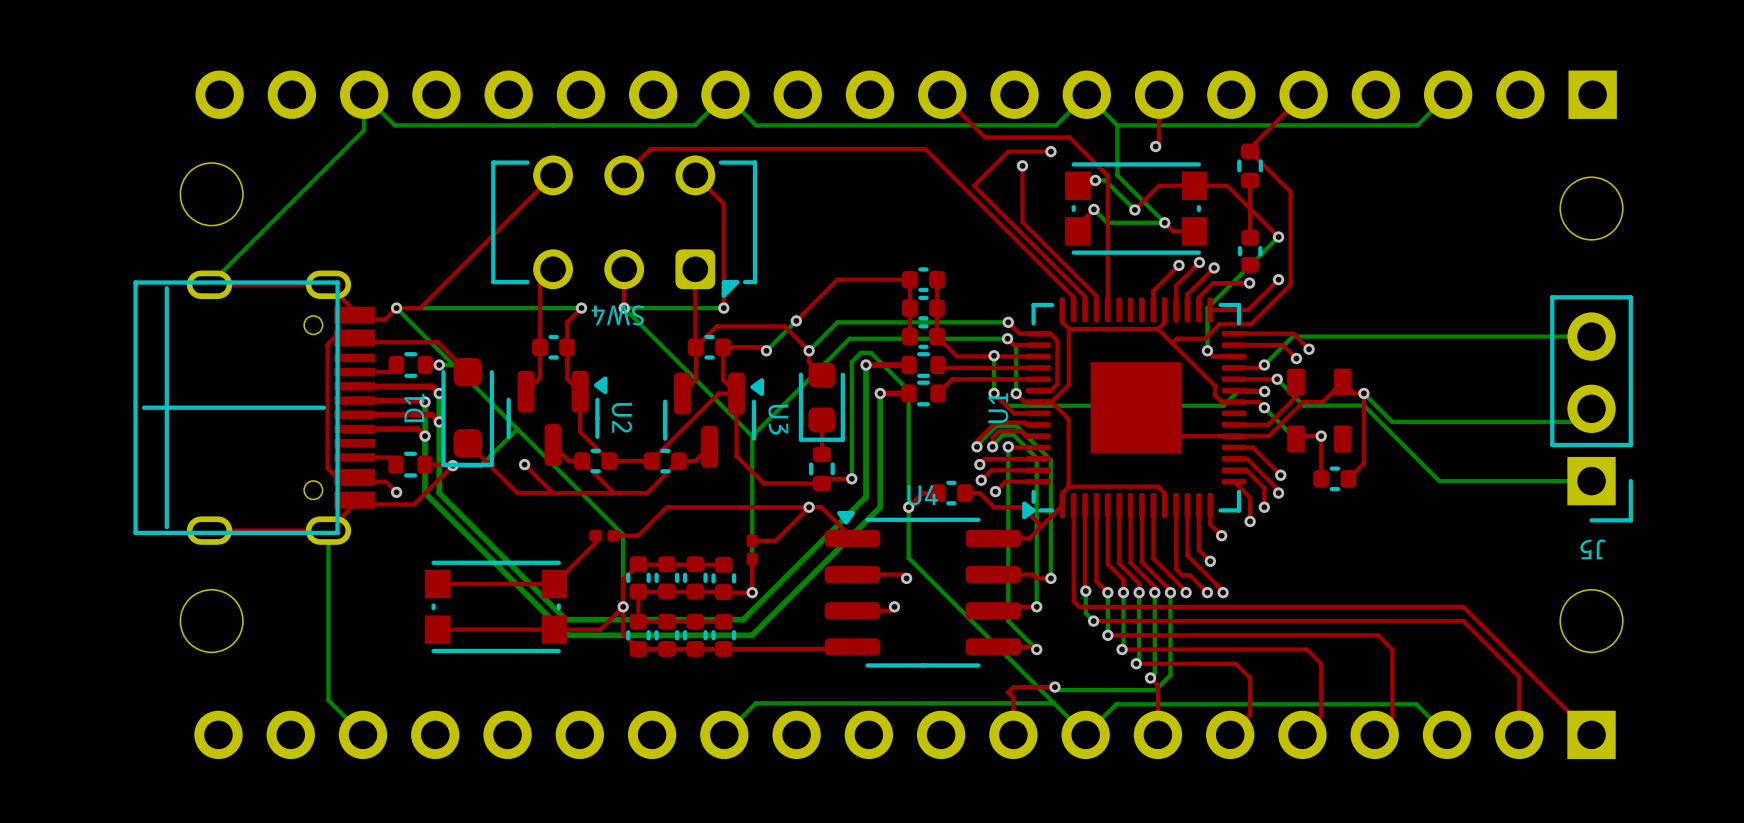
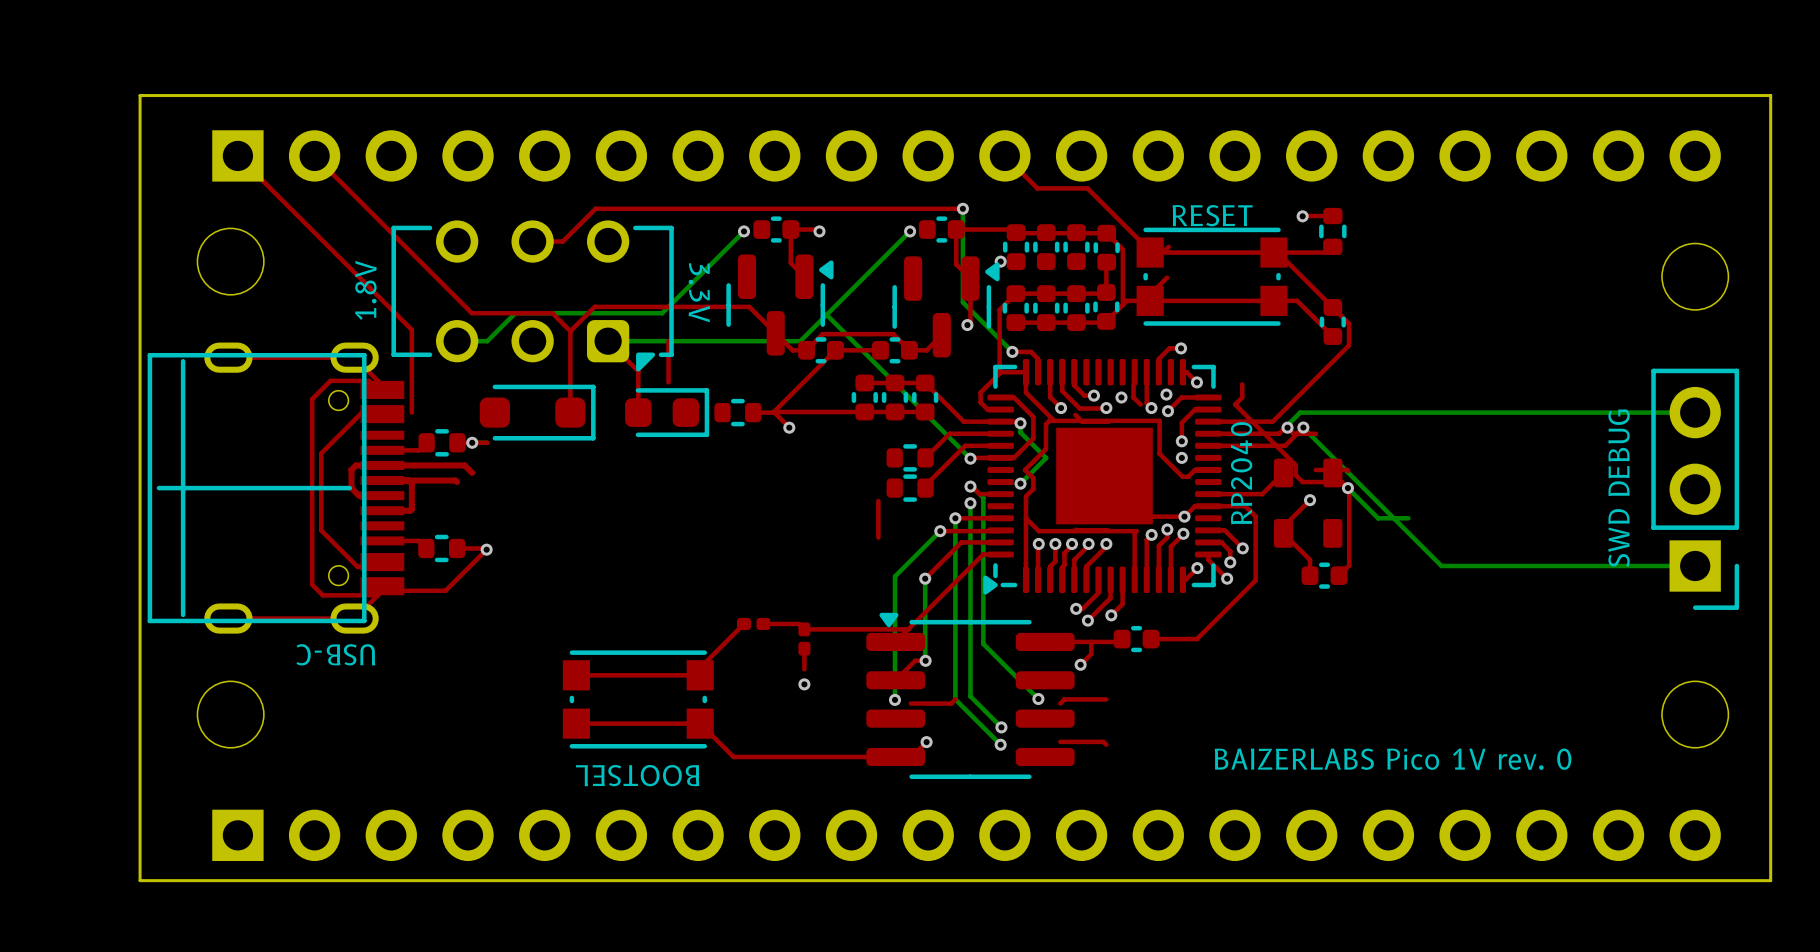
board edge: none -> (140, 95) (1770, 95) (1770, 880) (140, 880) (140, 95)
top track: none -> (237, 155) (411, 329) (411, 412)
top track: none -> (314, 155) (471, 313) (552, 313) (570, 331)
part rotation: 0° (906, 94) -> 180° (966, 155)
top track: none -> (1004, 155) (1037, 188) (1087, 188) (1150, 252)
top track: (942, 94) (984, 137) (1069, 137) (1107, 175) (1107, 309) -> none
top track: (1159, 94) (1159, 143) (1155, 146) -> none
top track: (1303, 94) (1250, 148) (1250, 151) (1290, 191) (1290, 284) (1251, 324) (1219, 324) (1205, 338) (1176, 338) (1172, 343) -> none
bottom track: (1448, 94) (1417, 125) (1117, 125) -> none
bottom track: (1117, 125) (1117, 175) (1164, 222) (1107, 222) (1093, 209) -> none
bottom track: (1117, 125) (1086, 94) (1056, 125) (756, 125) (725, 94) (694, 125) (394, 125) (364, 94) (364, 130) (209, 284) -> none
top track: none -> (962, 208) (595, 208) (562, 241) (532, 241)
bottom track: none -> (962, 208) (962, 302) (1012, 351)
via: none -> (962, 208)
via: (1155, 146) -> none
top track: (1050, 151) (1008, 151) (974, 185) (1085, 296) (1085, 309) -> none
via: (1050, 151) -> none
text: none -> RESET (1212, 215)
via: none -> (1302, 216)
part: none -> (776, 229)
part: none -> (941, 229)
bottom track: none -> (744, 231) (662, 313) (515, 313) (487, 341) (457, 341)
via: none -> (744, 231)
top track: none -> (819, 231) (817, 229) (790, 229) (790, 263) (804, 276)
via: none -> (819, 231)
bottom track: none -> (910, 231) (800, 341) (608, 341)
via: none -> (910, 231)
top track: (1022, 165) (1022, 222) (1096, 295) (1096, 309) -> none
via: (1022, 165) -> none
top track: none -> (1016, 232) (1012, 229) (956, 229) (956, 264) (970, 278) (970, 322) (967, 325)
top track: none -> (1019, 233) (1106, 233) (1122, 249) (1122, 304)
top track: (553, 175) (420, 308) (396, 308) (385, 319) (354, 319) -> (377, 595) (322, 595) (312, 584) (312, 399) (330, 380) (368, 380) (382, 394)
top track: (624, 175) (650, 149) (925, 149) (1073, 297) (1073, 309) -> none
top track: (695, 175) (723, 203) (723, 308) -> none
part: none -> (1016, 247)
part: none -> (1046, 247)
part: none -> (1076, 247)
bottom track: (1095, 180) (1105, 180) (1134, 209) -> none
via: (1095, 180) -> none
top track: (1250, 180) (1250, 237) -> (1332, 246) (1327, 252) (1308, 252)
part: none -> (1106, 247)
top track: (1159, 185) (1134, 209) -> (1236, 252) (1162, 252)
top track: none -> (1277, 252) (1349, 323) (1349, 345) (1272, 421) (1208, 421)
top track: (1227, 185) (1278, 236) -> none
via: none -> (1000, 261)
top track: none -> (1106, 262) (1105, 293) (1015, 293) (999, 309) (1000, 372)
via: (1093, 209) -> none
via: (1134, 209) -> none
text: none -> 1.8V (365, 290)
top track: (1164, 222) (1173, 231) -> (1015, 322) (1105, 322) (1126, 300) (1251, 300)
via: (1164, 222) -> none
text: none -> 3.3V (699, 292)
part: none -> (532, 295)
SW4: (624, 226) -> none
top track: none -> (1273, 300) (1297, 300) (1332, 336)
part: none -> (779, 305)
part: none -> (946, 306)
part: none -> (1106, 306)
bottom track: (1278, 236) (1207, 308) (1207, 350) -> none
via: (1278, 236) -> none
part: none -> (1015, 308)
part: none -> (1046, 308)
part: none -> (1076, 308)
bottom track: none -> (827, 314) (970, 458)
via: none -> (967, 325)
top track: none -> (570, 331) (594, 306) (749, 306) (792, 350) (806, 350) (822, 334) (893, 334) (909, 350) (926, 350) (941, 335)
top track: none -> (570, 331) (570, 412)
top track: (1199, 262) (1176, 285) (1176, 309) -> none
via: (1199, 262) -> none
top track: (1178, 265) (1153, 291) (1153, 309) -> none
via: (1178, 265) -> none
top track: (1214, 267) (1187, 294) (1187, 309) -> none
via: (1214, 267) -> none
top track: (553, 269) (539, 282) (539, 377) (526, 391) -> none
top track: none -> (608, 341) (638, 371) (638, 412)
top track: (695, 269) (695, 350) -> none
top track: none -> (1181, 348) (1169, 348) (1158, 359) (1158, 372)
via: none -> (1181, 348)
part: none -> (821, 350)
top track: none -> (880, 350) (835, 350) (773, 412) (753, 412)
part: none -> (894, 350)
part: (923, 279) -> none
top track: (937, 279) (937, 336) (957, 356) (1038, 356) -> none
top track: none -> (1012, 351) (1030, 351) (1038, 359) (1038, 372)
via: none -> (1012, 351)
top track: (1278, 279) (1248, 309) (1210, 309) -> none
via: (1278, 279) -> none
top track: (1249, 283) (1213, 283) (1198, 297) (1198, 309) -> none
via: (1249, 283) -> none
top track: none -> (1000, 372) (1025, 372) (1025, 392) (1054, 420)
top track: none -> (1000, 372) (980, 392) (980, 402) (987, 409) (1000, 409)
top track: none -> (1050, 372) (1050, 397) (1061, 408)
top track: none -> (1062, 372) (1062, 390) (1079, 408) (1106, 408)
top track: none -> (1074, 372) (1074, 385) (1084, 395) (1093, 395)
top track: none -> (1146, 372) (1146, 403) (1151, 408)
top track: none -> (1182, 372) (1186, 372) (1196, 382)
via: (396, 308) -> none
top track: (581, 308) (567, 322) (567, 378) (580, 391) (580, 431) (609, 461) (651, 461) (718, 393) (736, 393) -> none
bottom track: (581, 308) (396, 308) (623, 534) (623, 606) -> none
via: (581, 308) -> none
via: (624, 308) -> none
bottom track: (723, 308) (624, 308) (752, 436) -> none
via: (723, 308) -> none
top track: none -> (864, 383) (925, 383) (963, 421) (1018, 421) (1020, 423)
part: (923, 308) -> none
via: none -> (1196, 382)
via: none -> (1166, 394)
top track: (796, 320) (837, 279) (909, 279) (909, 336) -> none
bottom track: (796, 320) (766, 350) -> none
via: (796, 320) -> none
via: none -> (1093, 395)
part: none -> (864, 397)
part: none -> (894, 397)
part: none -> (925, 397)
top track: none -> (1000, 397) (1013, 397) (1033, 416) (1033, 438) (1013, 457) (970, 458)
top track: (1008, 322) (1019, 333) (1050, 333) (1057, 340) (1057, 384) (1050, 390) (1038, 390) -> none
bottom track: (1008, 322) (837, 322) (809, 350) -> none
via: (1008, 322) -> none
via: none -> (1121, 397)
top track: none -> (1208, 397) (1181, 397) (1168, 411)
top track: (1158, 329) (1069, 329) (1069, 384) (1051, 401) (1068, 419) (1068, 486) -> none
via: none -> (1061, 408)
via: none -> (1106, 408)
via: none -> (1151, 408)
top track: none -> (1208, 409) (1195, 409) (1181, 422) (1181, 441)
top track: (1234, 333) (1293, 333) (1309, 349) -> none
part footprint: [687, 334, 732, 360] -> [714, 398, 762, 427]
top track: none -> (925, 411) (773, 411) (789, 427)
via: none -> (1168, 411)
part: none -> (537, 412)
part: (923, 336) -> none
bottom track: (1292, 336) (1264, 365) -> (1378, 412) (1300, 412) (1284, 428)
via: (1007, 338) -> none
top track: (354, 342) (437, 342) (467, 372) -> none
top track: (327, 344) (327, 468) (341, 481) -> (353, 420) (321, 453) (321, 530) (357, 566) (368, 566)
top track: (1234, 345) (1283, 345) (1296, 358) -> none
bottom track: none -> (1020, 423) (1020, 432) (1046, 458) (1020, 483)
via: none -> (1020, 423)
part: (553, 347) -> none
via: (1309, 349) -> none
via: none -> (789, 427)
top track: (766, 350) (762, 347) (723, 347) (723, 380) (736, 393) -> none
via: (766, 350) -> none
via: (809, 350) -> none
top track: none -> (1303, 427) (1285, 445) (1208, 445)
via: none -> (1303, 427)
top track: none -> (1284, 428) (1279, 433) (1208, 433)
bottom track: (994, 355) (994, 393) (1006, 405) (1223, 405) (1237, 391) (1264, 391) -> none
via: (994, 355) -> none
top track: none -> (1000, 433) (949, 433) (925, 457)
via: (1296, 358) -> none
via: none -> (1181, 441)
top track: none -> (472, 442) (487, 442)
top track: (866, 365) (908, 365) -> (955, 518) (1000, 518)
bottom track: (866, 365) (866, 493) -> none
via: (866, 365) -> none
part: (923, 365) -> none
top track: (938, 365) (940, 367) (1038, 367) -> none
top track: (1264, 365) (1261, 367) (1234, 367) -> none
via: (1264, 365) -> none
top track: none -> (1000, 445) (965, 445) (925, 485) (925, 488)
top track: (821, 375) (809, 362) (809, 350) (784, 326) (716, 326) (695, 347) (695, 380) (682, 393) -> none
part: none -> (910, 457)
via: none -> (970, 458)
top track: (1038, 379) (952, 379) (938, 393) (938, 388) -> none
via: none -> (1181, 457)
top track: (1234, 379) (1277, 379) -> none
bottom track: (1277, 379) (1303, 405) (1363, 405) (1439, 481) -> (1303, 427) (1441, 566) (1533, 566)
via: (1277, 379) -> none
top track: (1296, 382) (1296, 396) (1268, 424) (1234, 424) -> none
top track: none -> (1208, 469) (1195, 469) (1188, 476) (1182, 476) (1159, 453) (1159, 420) (1049, 420) (1045, 424) (1045, 449) (1025, 469) (1033, 478) (1033, 488) (1025, 496) (1025, 579)
via: (1264, 391) -> none
bottom track: (439, 393) (439, 493) (565, 619) (743, 619) (866, 496) -> (925, 660) (925, 582)
via: (439, 393) -> none
top track: (736, 393) (736, 456) (763, 483) (821, 483) (826, 478) (851, 478) -> none
top track: (880, 393) (908, 393) -> (1302, 216) (1332, 216)
bottom track: (880, 393) (880, 507) (752, 635) (567, 635) (425, 493) (425, 401) -> none
via: (880, 393) -> none
part: (923, 393) -> none
top track: (994, 393) (1013, 413) (1038, 413) -> none
via: (994, 393) -> none
bottom track: (1013, 393) (1016, 393) (1016, 347) (1007, 338) (849, 338) (752, 436) -> none
via: (1016, 393) -> none
text: none -> RP2040 (1241, 473)
top track: none -> (1283, 472) (1262, 494) (1208, 494)
bottom track: (1363, 393) (1392, 421) (1578, 421) (1591, 408) -> none
via: (1363, 393) -> none
top track: none -> (1104, 476) (1145, 516) (1184, 516) (1194, 506) (1245, 506) (1255, 516) (1255, 580) (1196, 639) (1151, 639)
part: none -> (1102, 476)
via: (425, 401) -> none
part rotation: 0° (821, 402) -> 90° counterclockwise (667, 412)
part position: (821, 402) -> (667, 412)
via: none -> (1020, 483)
top track: none -> (970, 486) (979, 494) (1000, 494)
bottom track: none -> (970, 486) (983, 497) (983, 643) (1038, 699)
via: none -> (970, 486)
part: none -> (910, 488)
top track: (1136, 407) (1164, 436) (1268, 436) (1302, 402) (1322, 402) (1342, 382) (1354, 393) (1363, 393) (1363, 463) (1348, 478) -> none
top track: none -> (1347, 488) (1349, 565) (1339, 575)
text: none -> SWD DEBUG (1619, 488)
U1: (1134, 408) -> none
part position: (1319, 410) -> (1308, 503)
D1: (467, 412) -> none
top track: (354, 414) (432, 414) (439, 421) -> (382, 495) (359, 495) (351, 488) (351, 469) (355, 465) (382, 465)
U2: (557, 418) -> none
top track: none -> (1310, 500) (1283, 526) (1283, 533) (1310, 559) (1310, 575)
via: none -> (1310, 500)
U3: (713, 420) -> none
via: (439, 421) -> none
bottom track: (908, 421) (908, 390) (871, 352) (861, 352) (851, 362) (851, 478) -> none
via: none -> (970, 503)
top track: (1038, 424) (995, 422) (976, 441) (976, 446) -> none
top track: (380, 429) (417, 429) (425, 436) -> (410, 510) (411, 483) (408, 480)
bottom track: (517, 429) (480, 465) (452, 465) -> none
via: none -> (1184, 516)
via: (425, 436) -> none
bottom track: (752, 436) (752, 592) -> none
bottom track: none -> (955, 518) (955, 699) (1000, 744)
via: none -> (955, 518)
top track: none -> (1025, 518) (1038, 531) (1136, 531) (1134, 533) (1134, 579)
top track: (1038, 436) (1026, 436) (1021, 431) (999, 431) (992, 437) (992, 446) -> none
via: (1321, 436) -> none
top track: (1296, 438) (1299, 436) (1321, 436) (1321, 478) -> none
top track: (467, 443) (517, 493) (647, 493) (679, 461) (695, 461) (709, 446) (707, 445) -> none
top track: (553, 445) (569, 461) (582, 461) (614, 493) -> none
bottom track: (976, 446) (996, 426) (1016, 426) (1050, 460) (1050, 578) -> none
via: (976, 446) -> none
bottom track: (992, 446) (1003, 434) (1013, 434) (1036, 458) (1036, 606) -> none
via: (992, 446) -> none
bottom track: (1008, 446) (1008, 621) (1036, 649) -> none
via: (1008, 446) -> none
top track: none -> (1167, 529) (1167, 537) (1158, 545) (1158, 579)
via: none -> (1167, 529)
top track: none -> (1000, 530) (940, 531)
top track: none -> (1208, 530) (1224, 530) (1242, 548)
top track: (1234, 447) (1253, 447) (1280, 475) -> none
bottom track: none -> (940, 531) (894, 576) (894, 699)
via: none -> (940, 531)
via: none -> (1183, 533)
top track: none -> (1151, 534) (1146, 539) (1146, 579)
via: none -> (1151, 534)
top track: none -> (1183, 534) (1170, 546) (1170, 579)
top track: none -> (1000, 542) (961, 542) (925, 578)
top track: (1038, 458) (985, 458) (979, 464) -> none
top track: none -> (1208, 542) (1221, 542) (1230, 551) (1230, 562)
top track: (1234, 458) (1247, 458) (1278, 490) (1278, 493) -> none
top track: none -> (1038, 543) (1038, 579)
via: none -> (1038, 543)
top track: none -> (1055, 543) (1055, 561) (1050, 566) (1050, 579)
via: none -> (1055, 543)
top track: none -> (1072, 543) (1064, 553) (1062, 579)
via: none -> (1072, 543)
top track: none -> (1088, 543) (1074, 559) (1074, 579)
via: none -> (1088, 543)
top track: none -> (1106, 543) (1106, 546) (1086, 566) (1086, 579)
via: none -> (1106, 543)
part: (595, 461) -> none
part: (665, 461) -> none
top track: (524, 464) (553, 493) -> none
via: (524, 464) -> none
via: (979, 464) -> none
via: none -> (1242, 548)
part: (821, 468) -> none
top track: none -> (1000, 554) (983, 554) (895, 641)
top track: (1038, 470) (991, 470) (981, 480) -> none
top track: none -> (1208, 554) (1208, 559) (1227, 578)
top track: (1234, 470) (1246, 470) (1264, 488) (1264, 507) -> none
via: (1280, 475) -> none
via: none -> (1230, 562)
via position: (851, 478) -> (925, 578)
part position: (1334, 478) -> (1324, 575)
via: (981, 480) -> none
top track: (354, 481) (385, 481) (396, 492) -> none
top track: (1038, 481) (1005, 481) (995, 491) -> none
top track: (1234, 481) (1250, 497) (1250, 521) -> none
top track: none -> (1197, 568) (1185, 579) (1182, 579)
via: none -> (1197, 568)
top track: (1068, 486) (1062, 493) (1062, 505) (1029, 538) (993, 538) -> none
top track: (1068, 486) (1158, 486) (1164, 493) (1164, 505) -> none
via: (995, 491) -> none
via: (396, 492) -> none
top track: (937, 493) (922, 493) (908, 507) -> none
part: (951, 493) -> none
top track: (965, 493) (979, 493) (994, 507) (1022, 507) (1041, 526) -> none
via: none -> (1227, 578)
via: (1278, 493) -> none
top track: none -> (1098, 579) (1098, 593) (1082, 608) (1076, 608)
top track: none -> (1110, 579) (1110, 598) (1087, 620)
top track: none -> (1122, 579) (1122, 604) (1111, 615)
U4 name: U4 (922, 495) -> none
top track: (1073, 505) (1073, 601) (1079, 606) (1463, 606) (1591, 734) -> none
top track: (1085, 505) (1085, 591) -> none
top track: (1096, 505) (1096, 581) (1107, 592) -> none
top track: (1107, 505) (1107, 564) (1123, 579) (1123, 592) -> none
top track: (1119, 505) (1119, 563) (1139, 583) (1139, 592) -> none
top track: (1130, 505) (1130, 562) (1154, 586) (1154, 592) -> none
top track: (1142, 505) (1142, 561) (1170, 592) -> none
top track: (1153, 505) (1153, 558) (1186, 592) -> none
top track: (1176, 505) (1176, 569) (1182, 575) (1189, 575) (1207, 592) -> none
top track: (1187, 505) (1187, 555) (1223, 592) -> none
top track: (1198, 505) (1198, 549) (1210, 561) -> none
top track: (1210, 505) (1210, 524) (1221, 535) -> none
top track: (809, 507) (775, 540) -> (908, 629) (829, 629)
via: (809, 507) -> none
via: (908, 507) -> none
via: (1264, 507) -> none
via: none -> (1076, 608)
via: (1250, 521) -> none
via: none -> (1111, 615)
bottom track: (328, 530) (328, 700) (363, 734) -> none
via: none -> (1087, 620)
top track: (595, 535) (595, 542) (554, 584) -> (744, 623) (700, 667) (700, 675) (594, 675)
part position: (604, 535) -> (753, 623)
top track: (613, 535) (638, 535) (666, 507) (821, 507) (852, 538) -> none
top track: none -> (763, 623) (798, 623) (804, 629)
via: (1221, 535) -> none
top track: none -> (1122, 639) (1119, 641) (1045, 641)
part: none -> (1136, 639)
J5 name: J5 (1593, 549) -> none
top track: none -> (1091, 641) (1091, 654) (1080, 664)
bottom track: (908, 557) (1085, 734) (1116, 704) (1416, 704) (1447, 734) -> (970, 647) (970, 696) (1001, 727)
via: (1210, 561) -> none
text: none -> USB-C (335, 654)
top track: (723, 564) (638, 564) (623, 579) (623, 633) (638, 648) (850, 648) (852, 646) -> none
top track: none -> (925, 660) (915, 660) (895, 680)
via: none -> (925, 660)
top track: (852, 574) (902, 574) (906, 578) -> none
top track: (993, 574) (1032, 574) (1036, 578) (1050, 578) -> none
via: none -> (1080, 664)
part: (638, 577) -> none
part: (666, 577) -> none
part: (695, 577) -> none
part: (723, 578) -> none
top track: (752, 578) (752, 592) (638, 591) (638, 621) (723, 621) -> none
via: (906, 578) -> none
via: (1050, 578) -> none
top track: (437, 584) (537, 584) -> none
U4 position: (922, 589) -> (970, 695)
bottom track: (1085, 591) (1085, 613) (1093, 621) -> none
via: (1085, 591) -> none
bottom track: (1107, 592) (1107, 635) -> none
via: (1107, 592) -> none
bottom track: (1123, 592) (1122, 649) -> none
via: (1123, 592) -> none
bottom track: (1139, 592) (1139, 660) (1136, 663) -> none
via: (1139, 592) -> none
bottom track: (1154, 592) (1154, 673) (1150, 677) -> none
via: (1154, 592) -> none
bottom track: (1170, 592) (1170, 675) (1155, 690) (1057, 690) (1054, 687) -> none
via: (1170, 592) -> none
via: (1186, 592) -> none
via: (1207, 592) -> none
via: (1223, 592) -> none
part position: (496, 606) -> (638, 699)
top track: (623, 606) (600, 629) -> (926, 742) (911, 756) (733, 756) (700, 723) (643, 723)
via: (623, 606) -> none
via: (894, 606) -> none
via: none -> (1038, 699)
via: (1036, 606) -> none
via: none -> (894, 699)
top track: (1093, 621) (1463, 621) (1519, 676) (1519, 734) -> none
via: (1093, 621) -> none
top track: (437, 629) (537, 629) -> none
via: none -> (1001, 727)
part: (638, 635) -> none
part: (666, 635) -> none
part: (695, 635) -> none
part: (723, 635) -> none
top track: (1107, 635) (1378, 635) (1392, 649) (1392, 717) (1374, 734) -> none
via: (1107, 635) -> none
via: none -> (926, 742)
via: none -> (1000, 744)
via: (1036, 649) -> none
top track: (1122, 649) (1307, 649) (1321, 663) (1321, 716) (1302, 734) -> none
via: (1122, 649) -> none
top track: (1136, 663) (1235, 663) (1250, 677) (1250, 714) (1230, 734) -> none
via: (1136, 663) -> none
text: none -> BAIZERLABS Pico 1V rev. 0 (1393, 759)
top track: (1150, 677) (1157, 685) (1157, 734) -> none
via: (1150, 677) -> none
text: none -> BOOTSEL (637, 775)
top track: (1054, 687) (1013, 687) (1008, 692) (1013, 697) (1013, 734) -> none
via: (1054, 687) -> none
bottom track: (1054, 703) (755, 703) (724, 734) -> none
part rotation: 0° (905, 734) -> 180° (966, 835)

